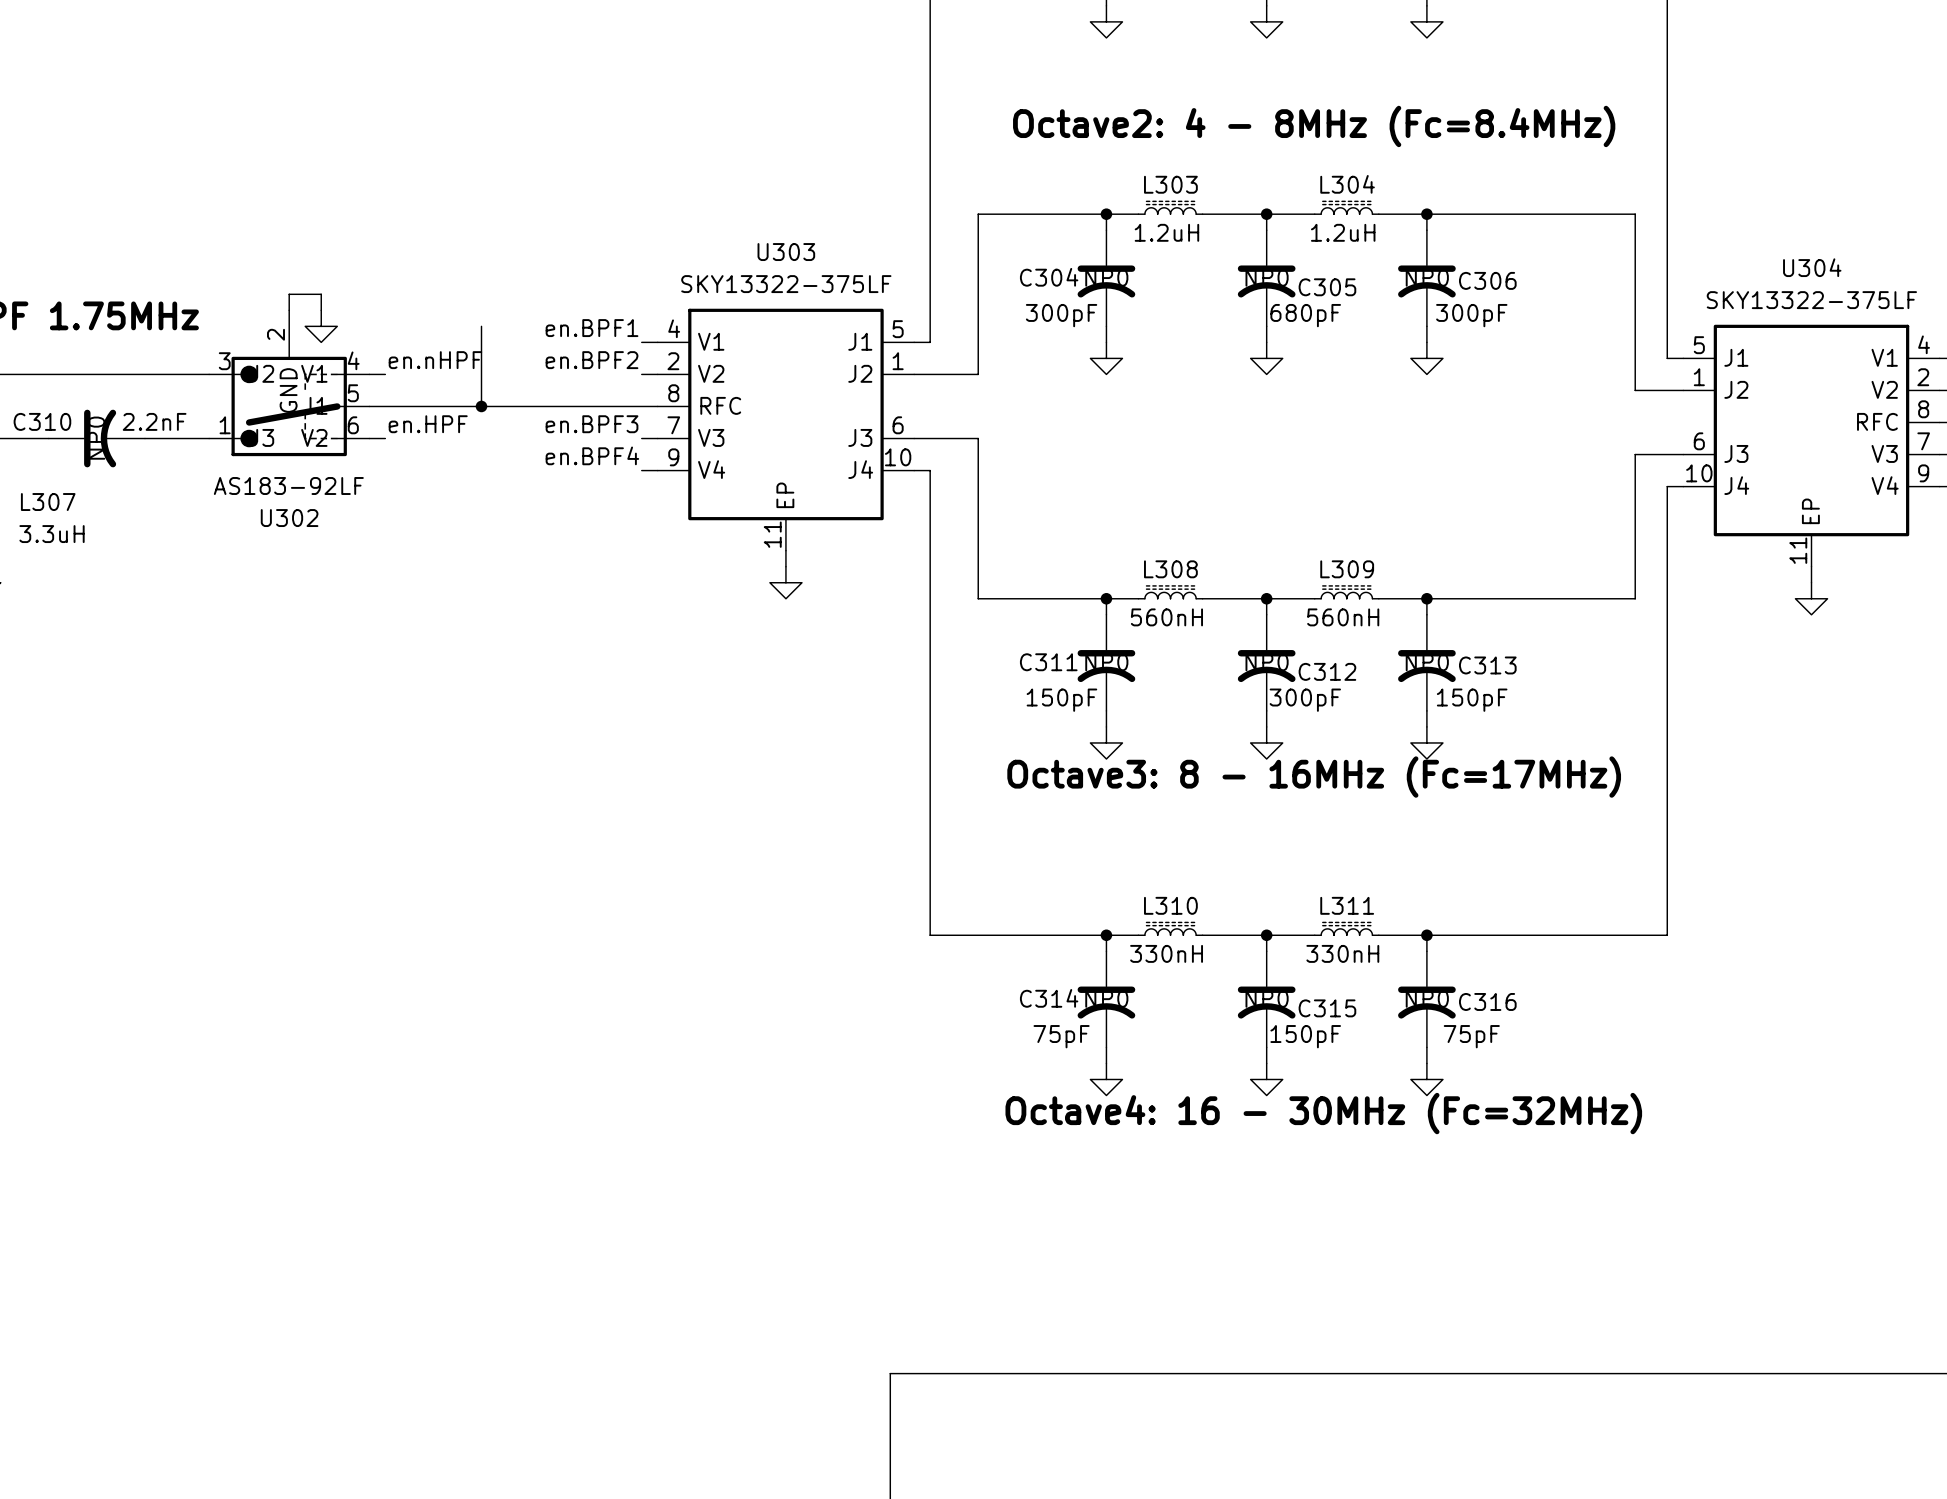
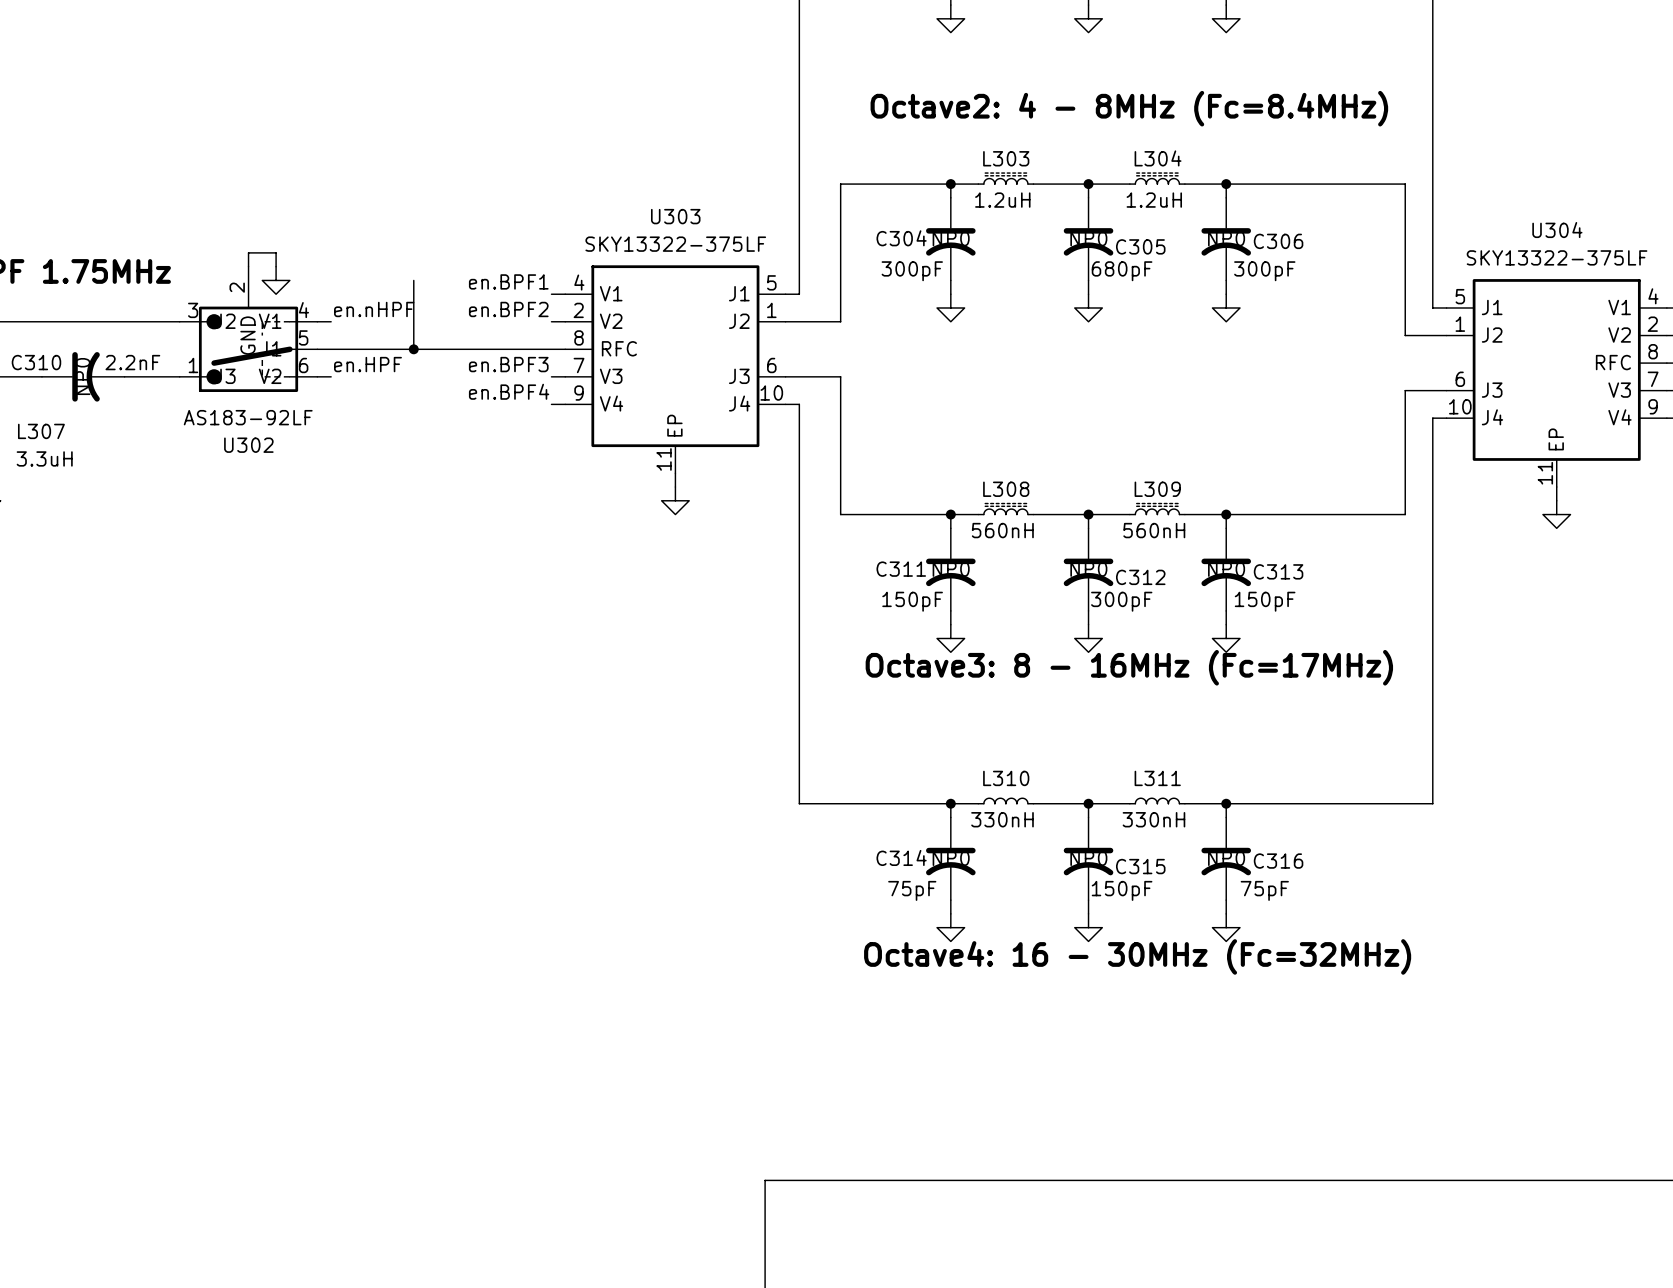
L310 symbol: [1138, 922, 1203, 936] -> [978, 798, 1034, 804]
L311 symbol: [1314, 922, 1379, 936] -> [1129, 798, 1185, 804]

